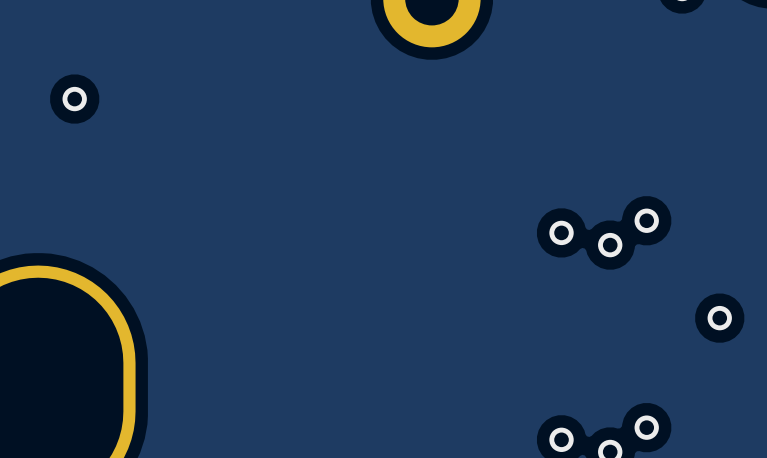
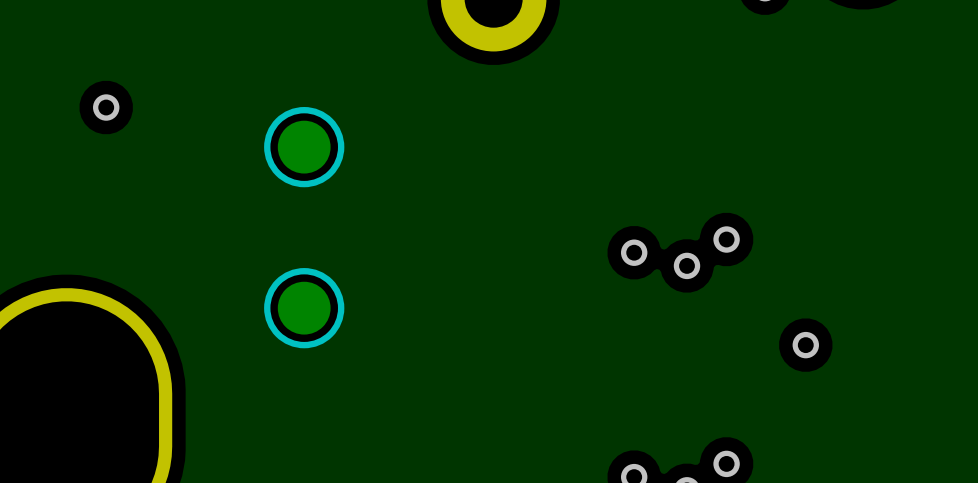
part: none -> (304, 147)
part: none -> (304, 308)

